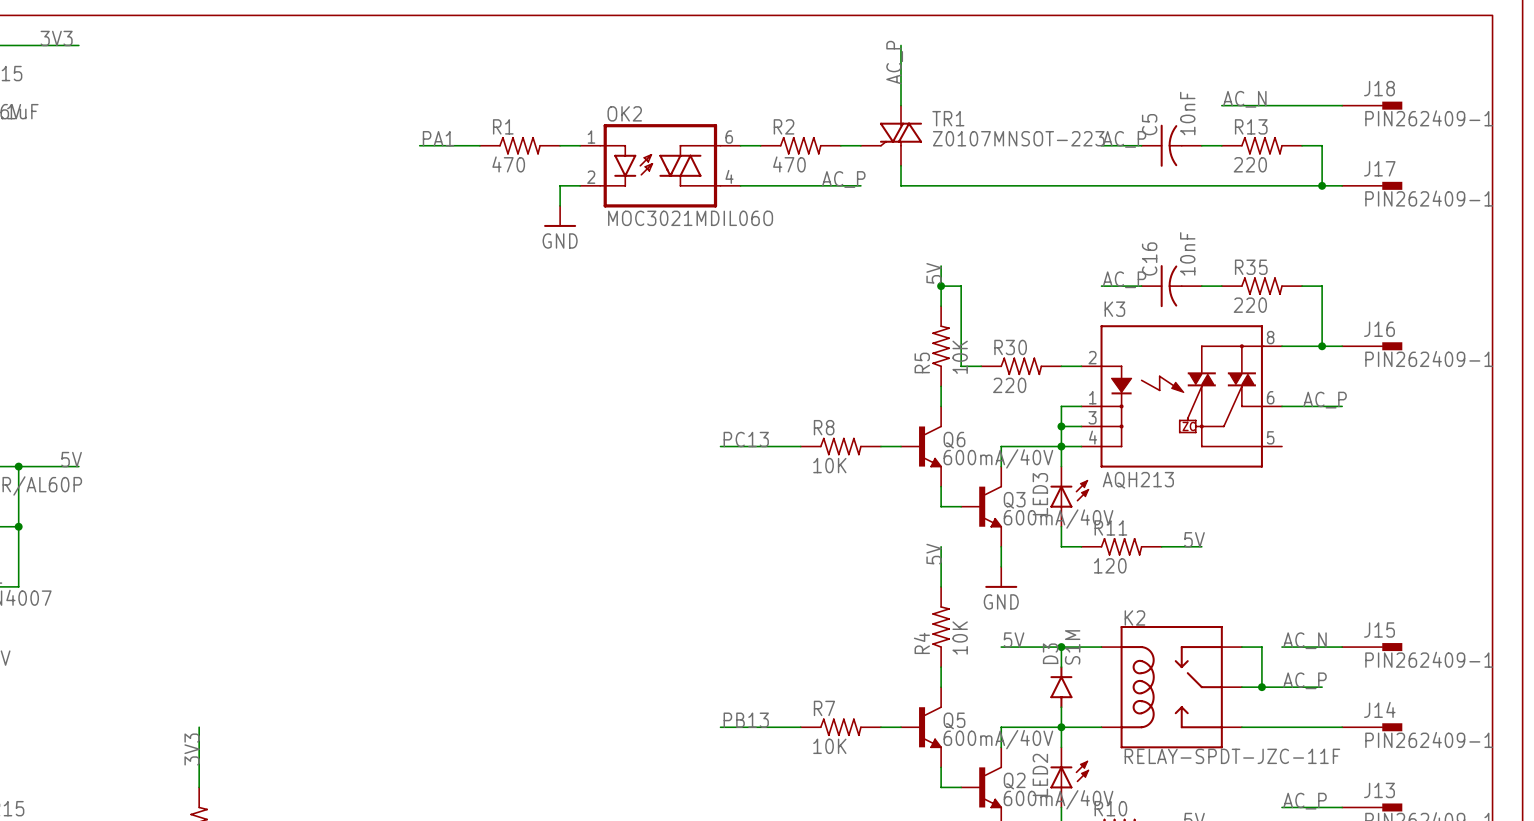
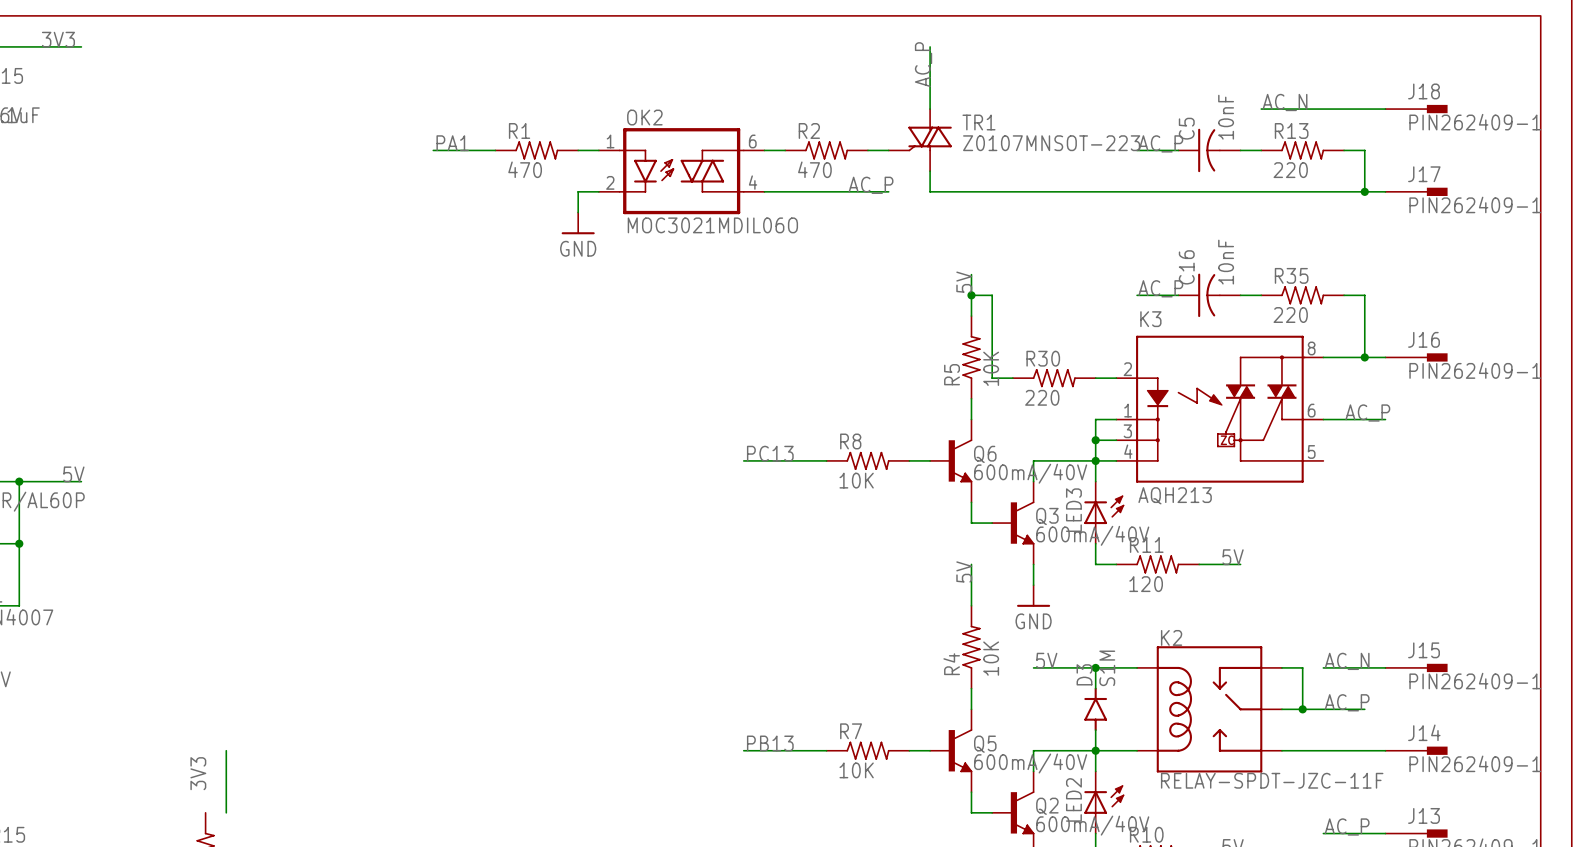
wire: (199, 727) (199, 787) -> (226, 750) (226, 812)

